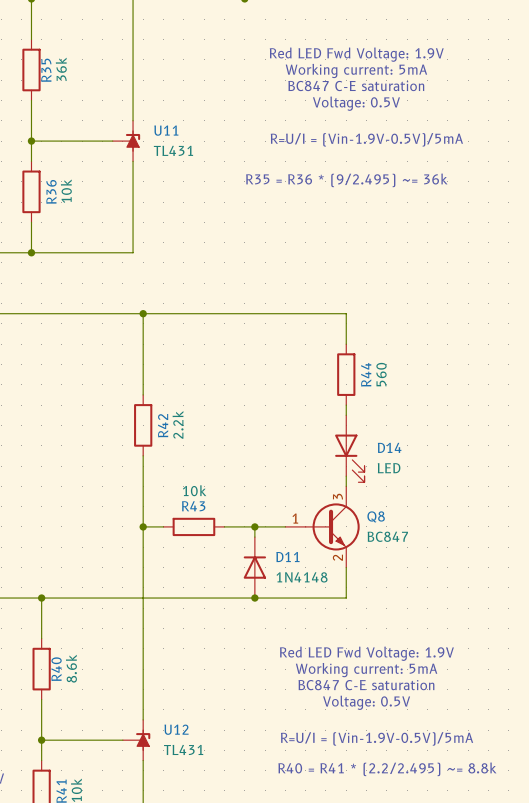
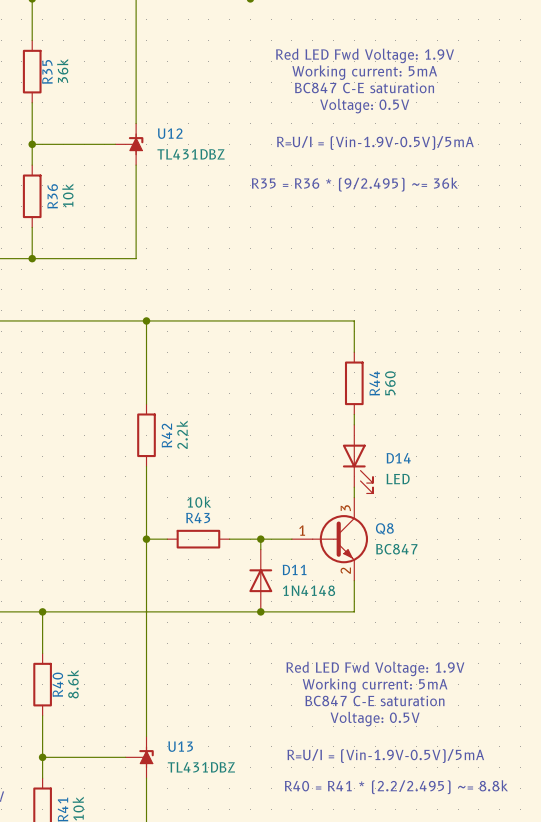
U11 name: U11 (166, 130) -> U12 (170, 133)
U11 value: TL431 (173, 150) -> TL431DBZ (191, 154)
U12 name: U12 (176, 729) -> U13 (180, 746)
U12 value: TL431 (183, 749) -> TL431DBZ (201, 767)

